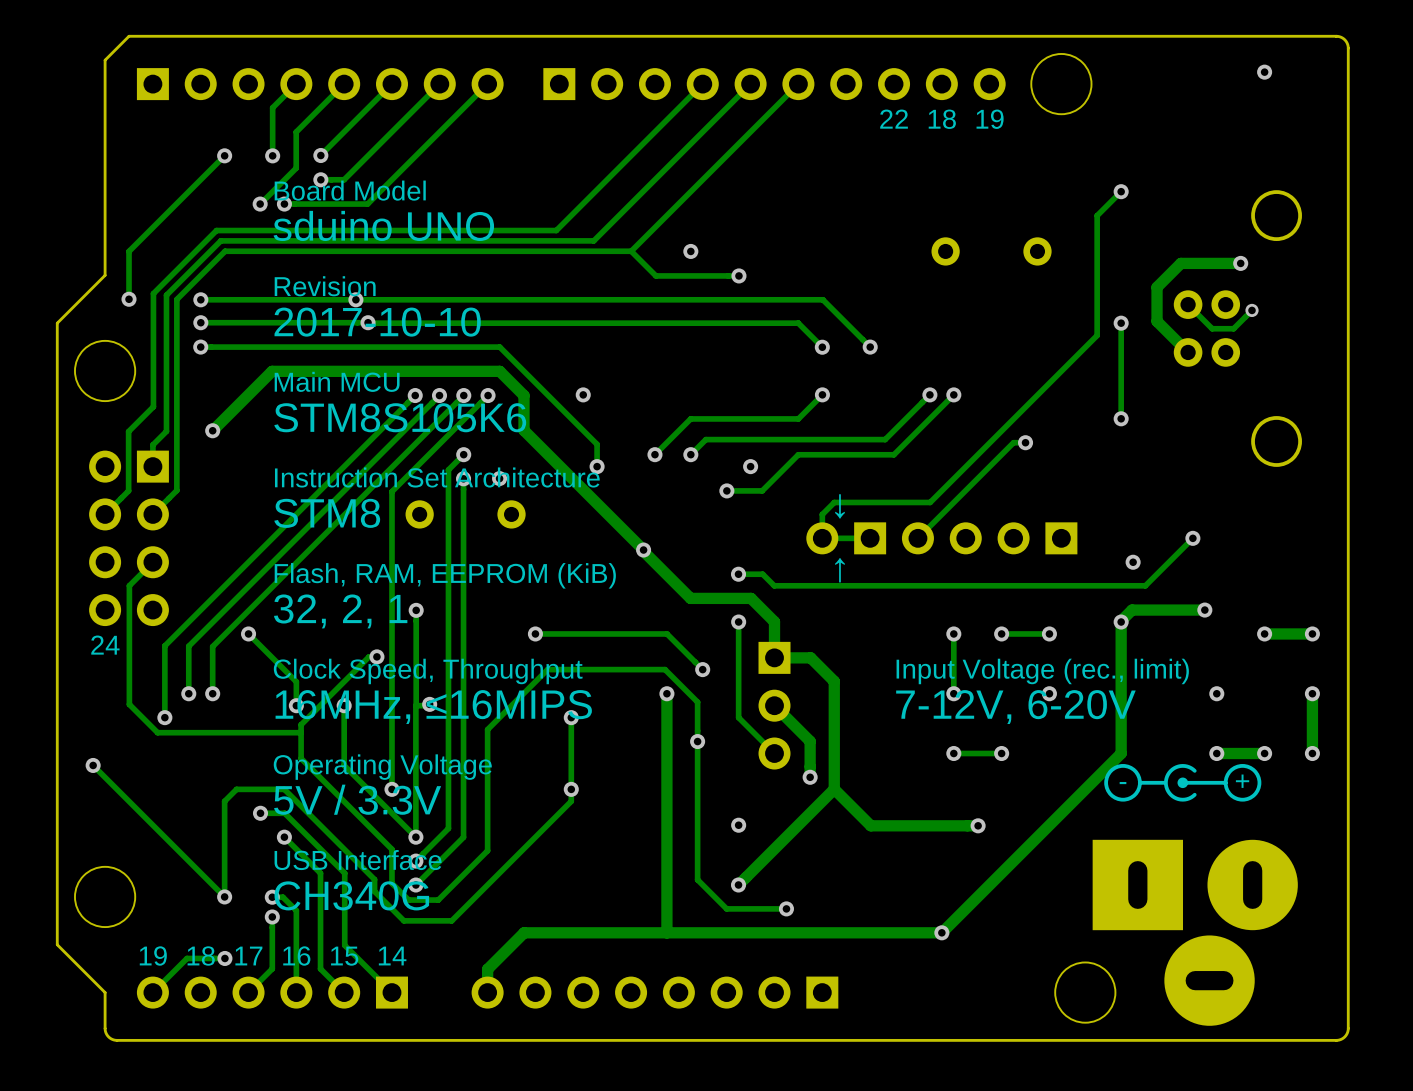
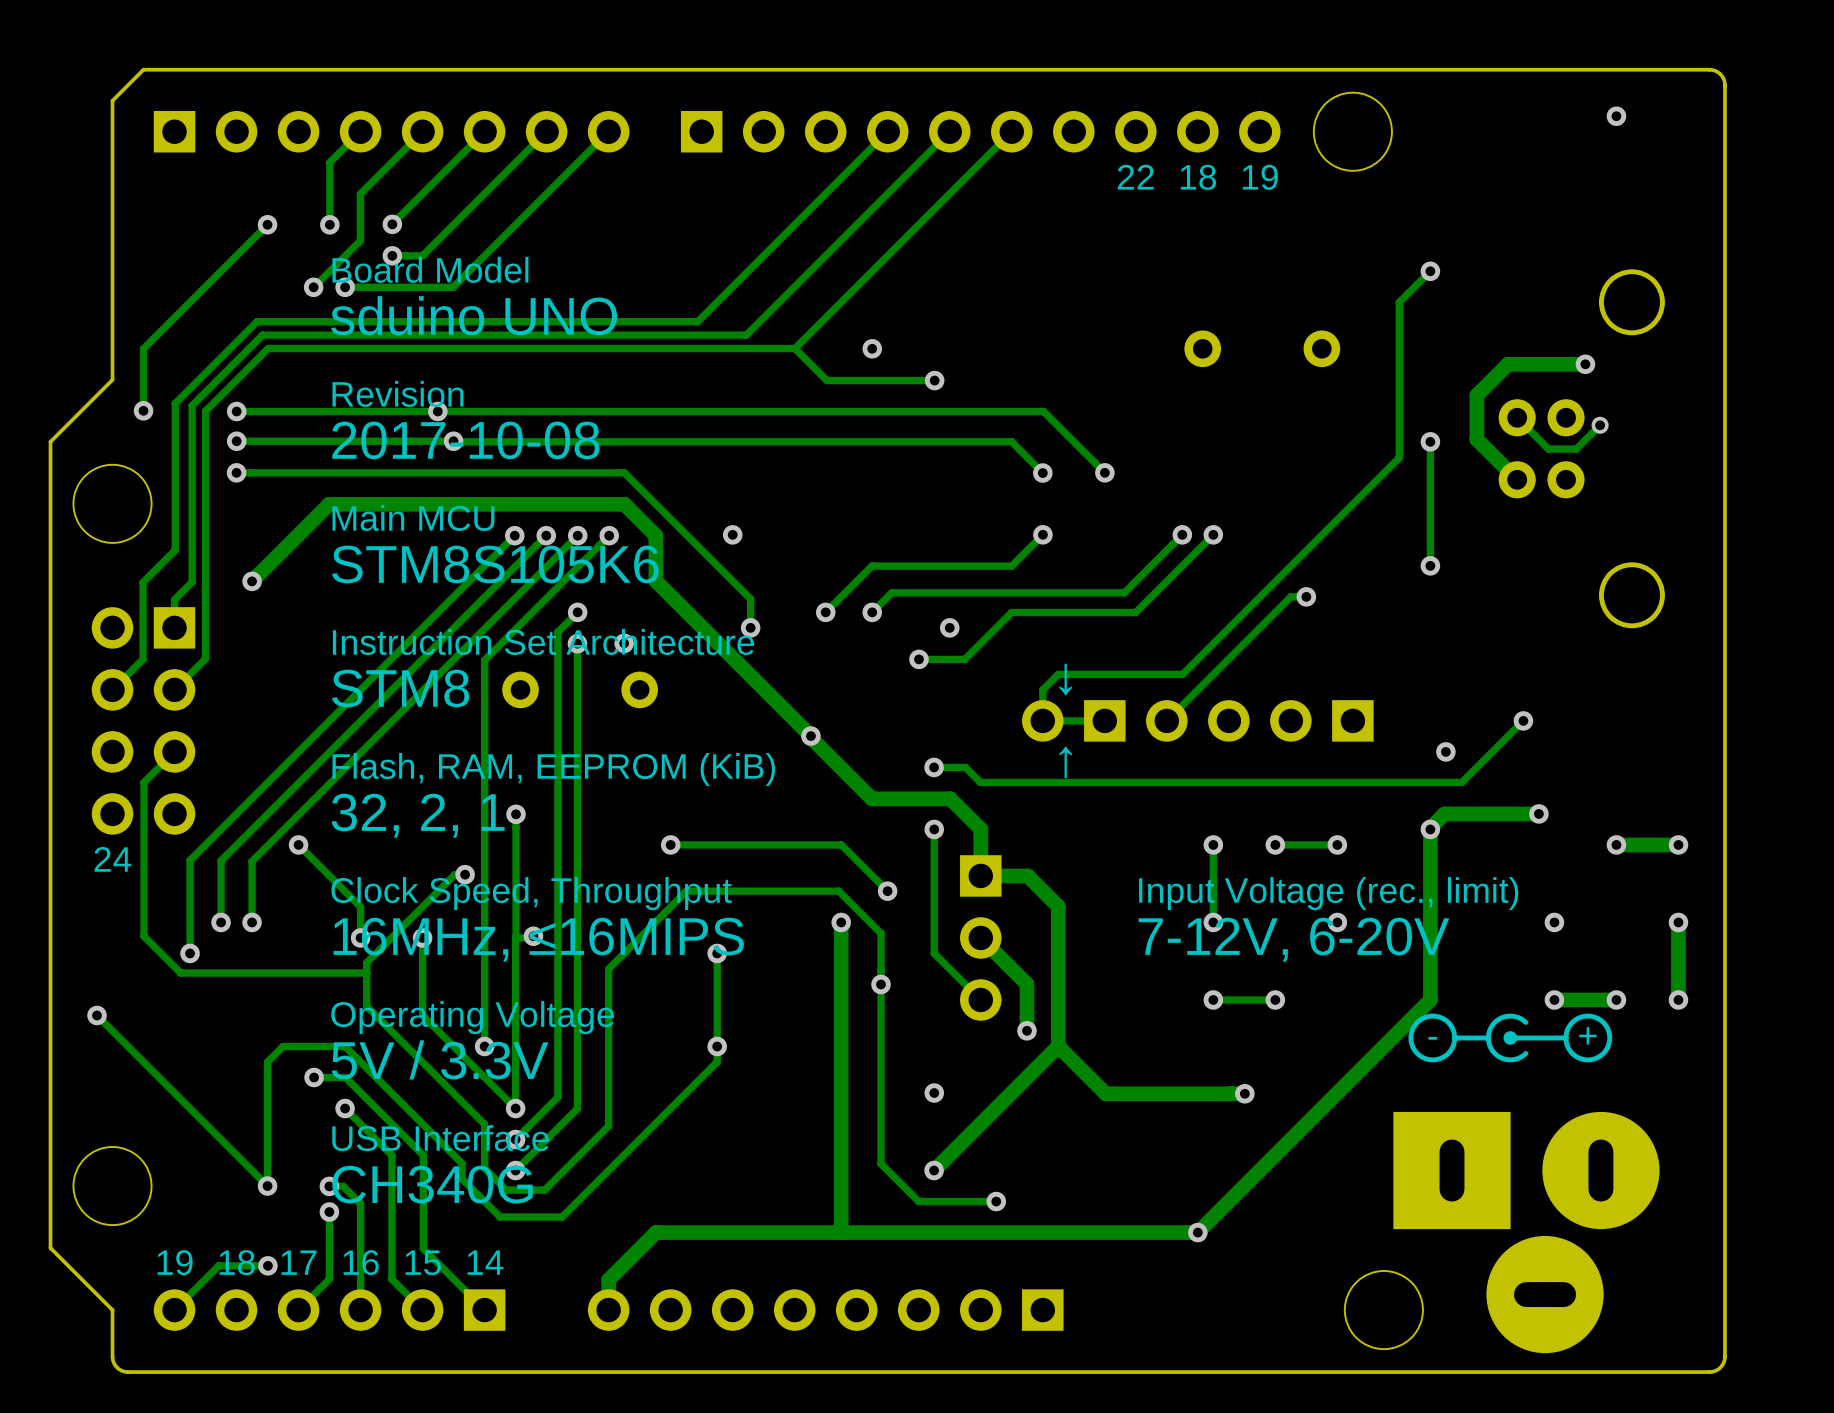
text: 2017-10-10 (377, 322) -> 2017-10-08 (465, 440)

